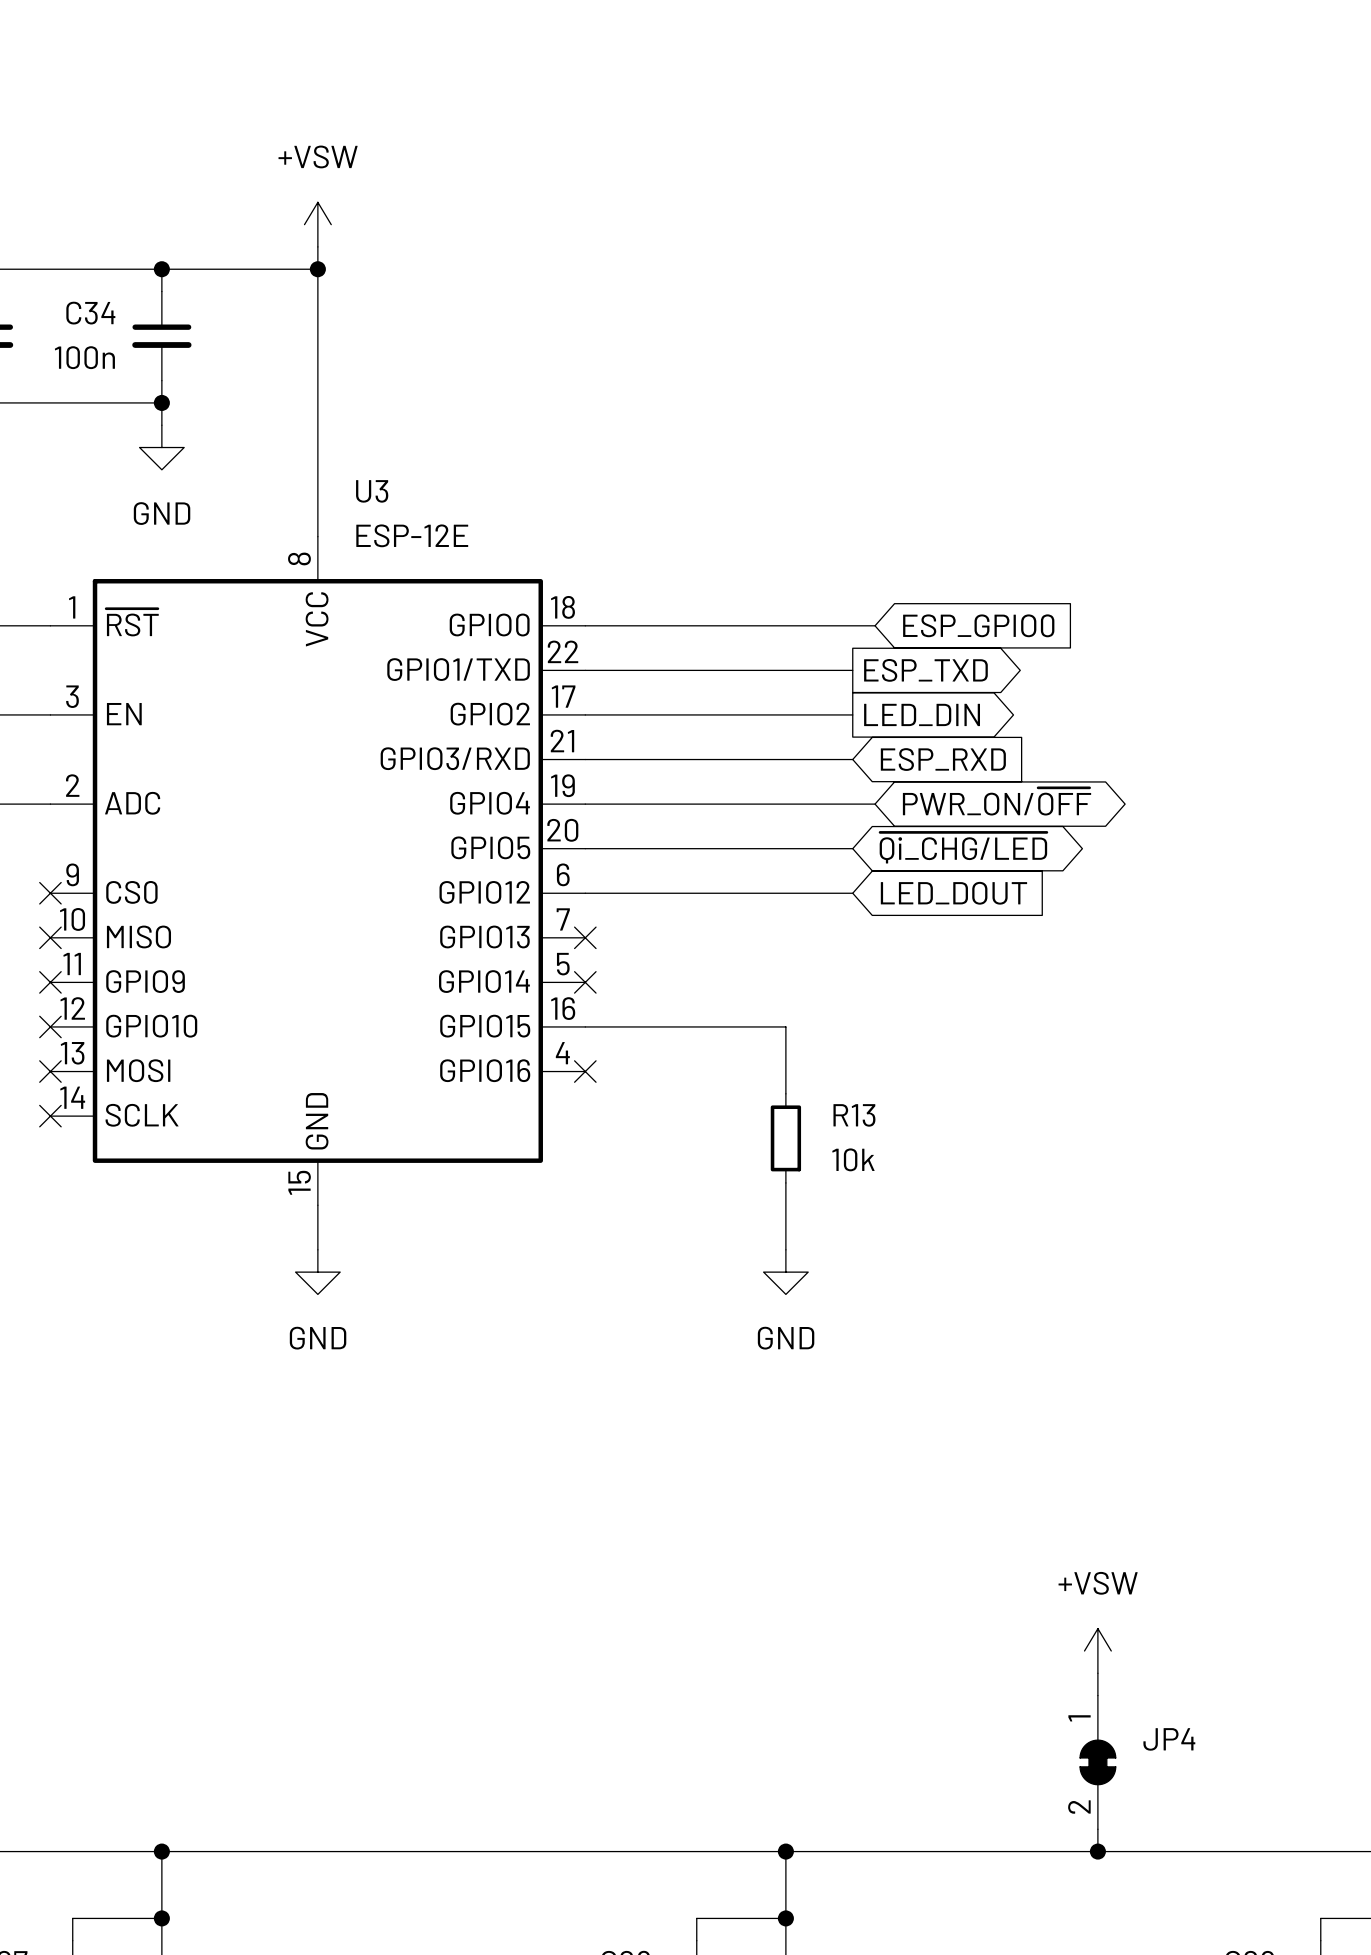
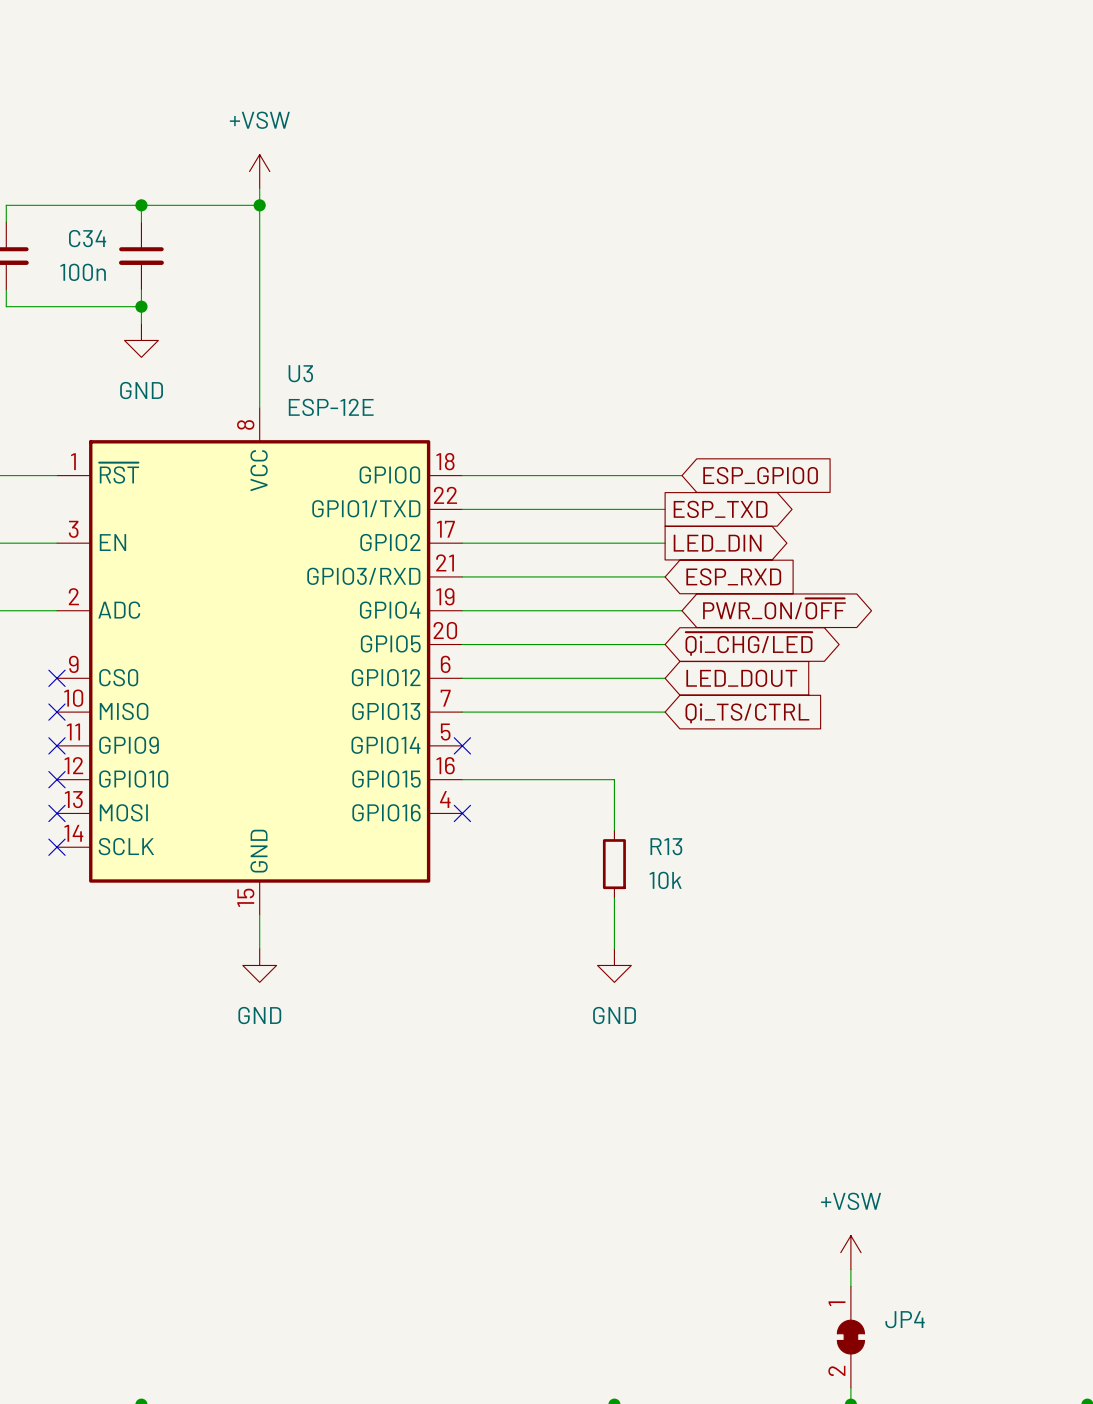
wire: none -> (462, 712) (665, 712)
no-connect mark: (585, 937) -> none
global label: none -> Qi_TS/CTRL (747, 713)

